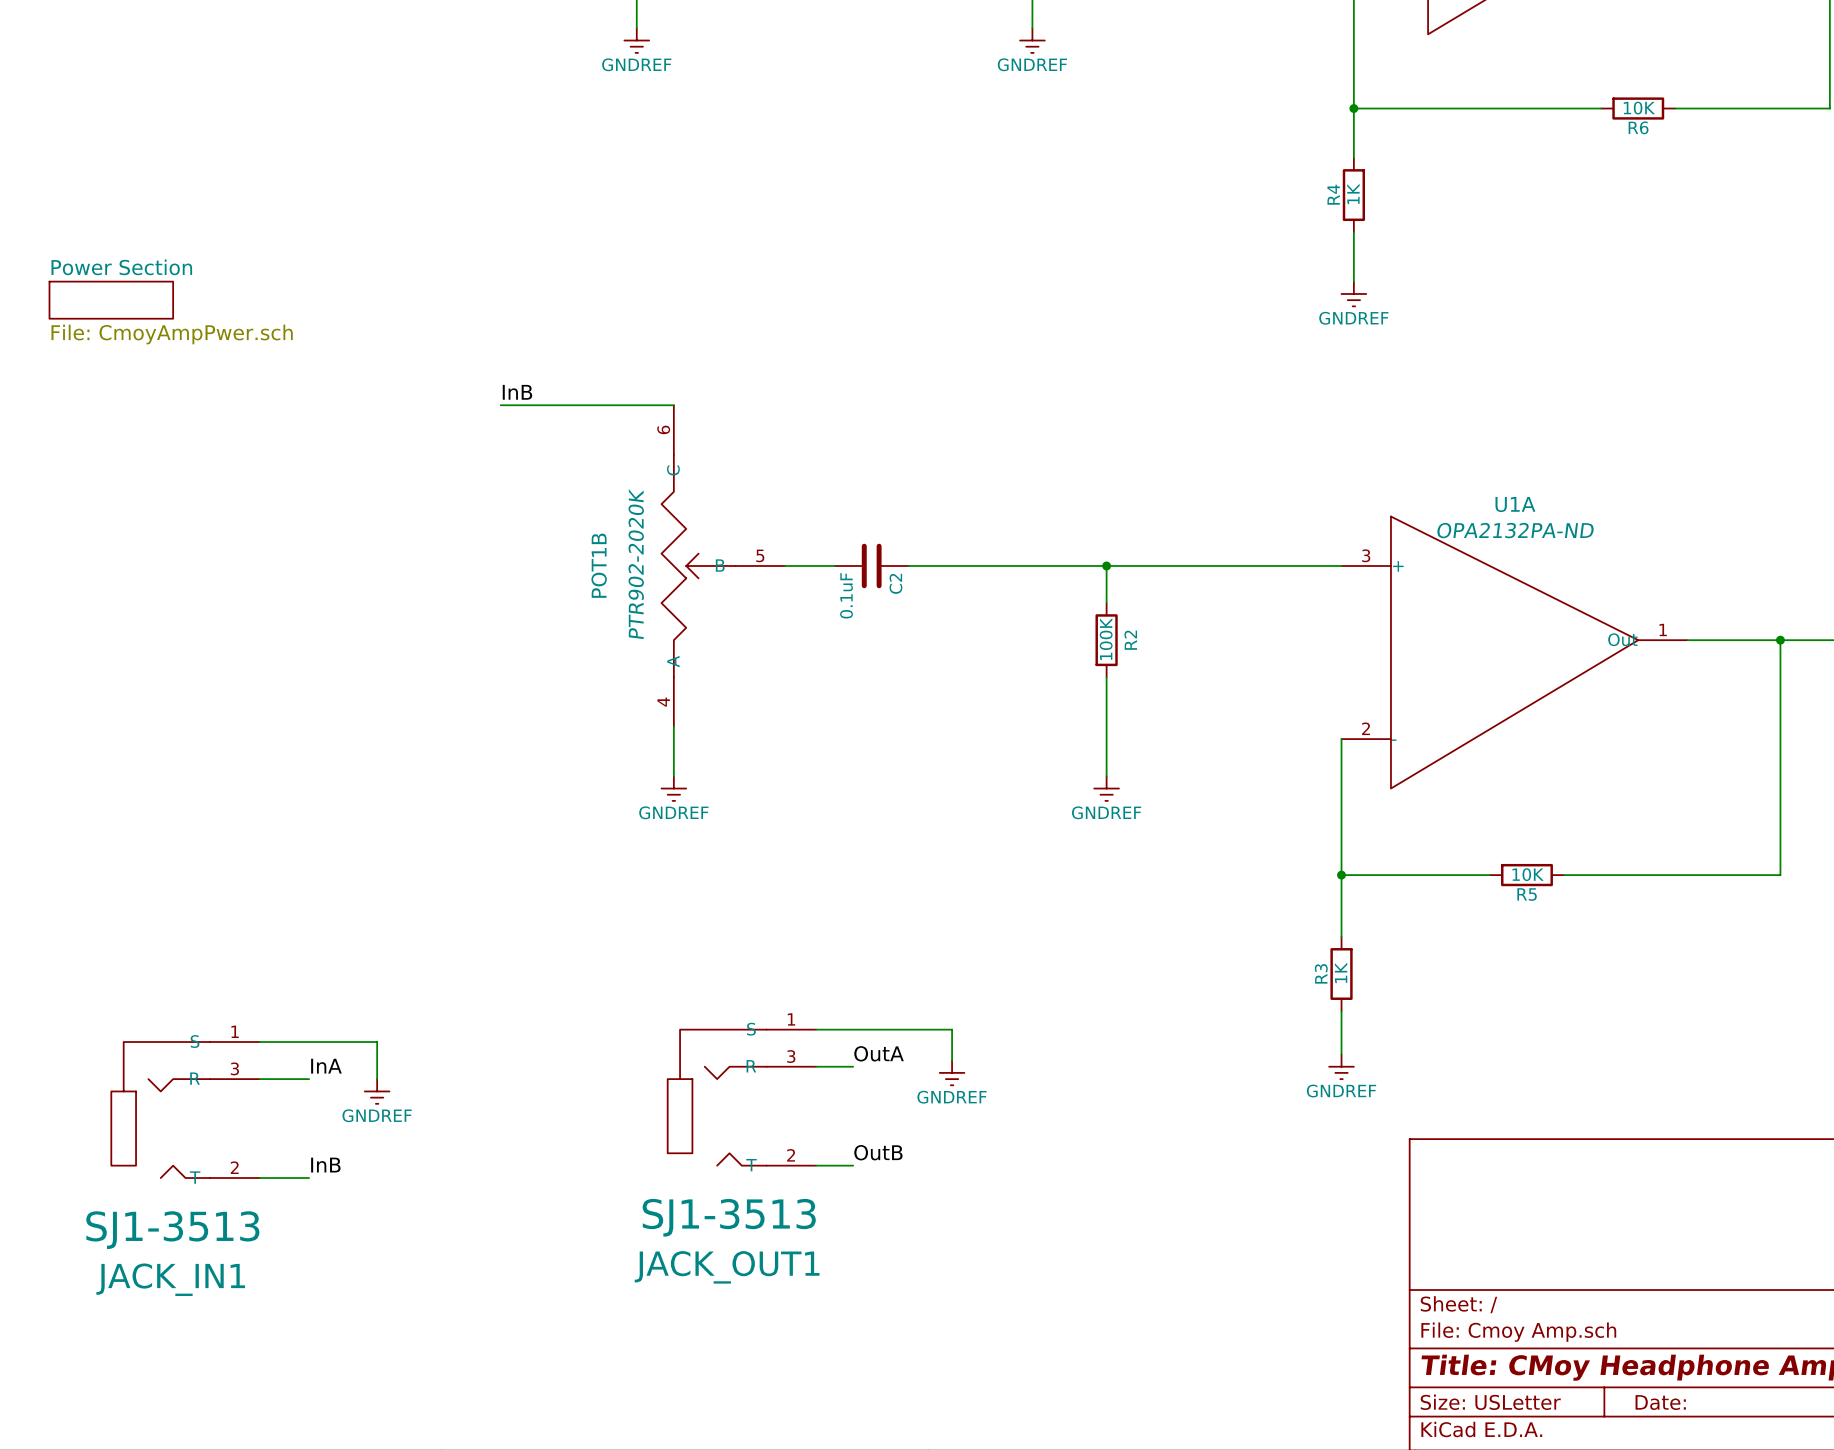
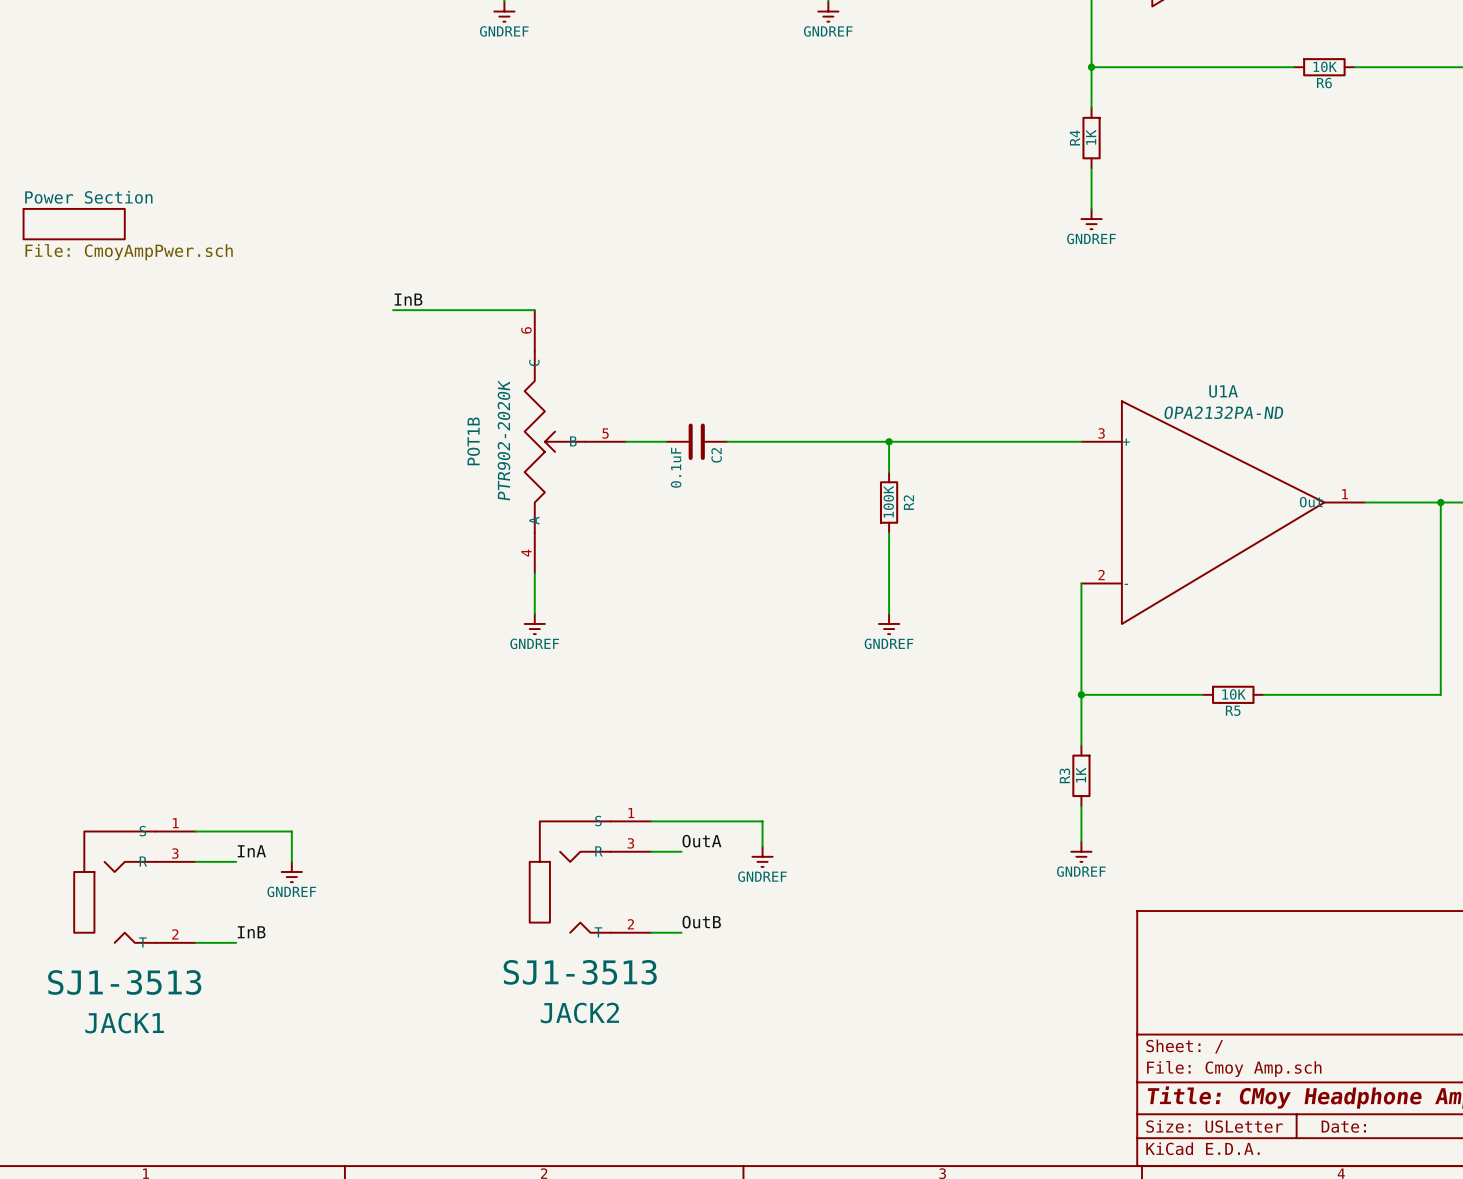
JACK_OUT1 name: JACK_OUT1 (727, 1267) -> JACK2 (579, 1012)
JACK_IN1 name: JACK_IN1 (170, 1279) -> JACK1 (124, 1023)

